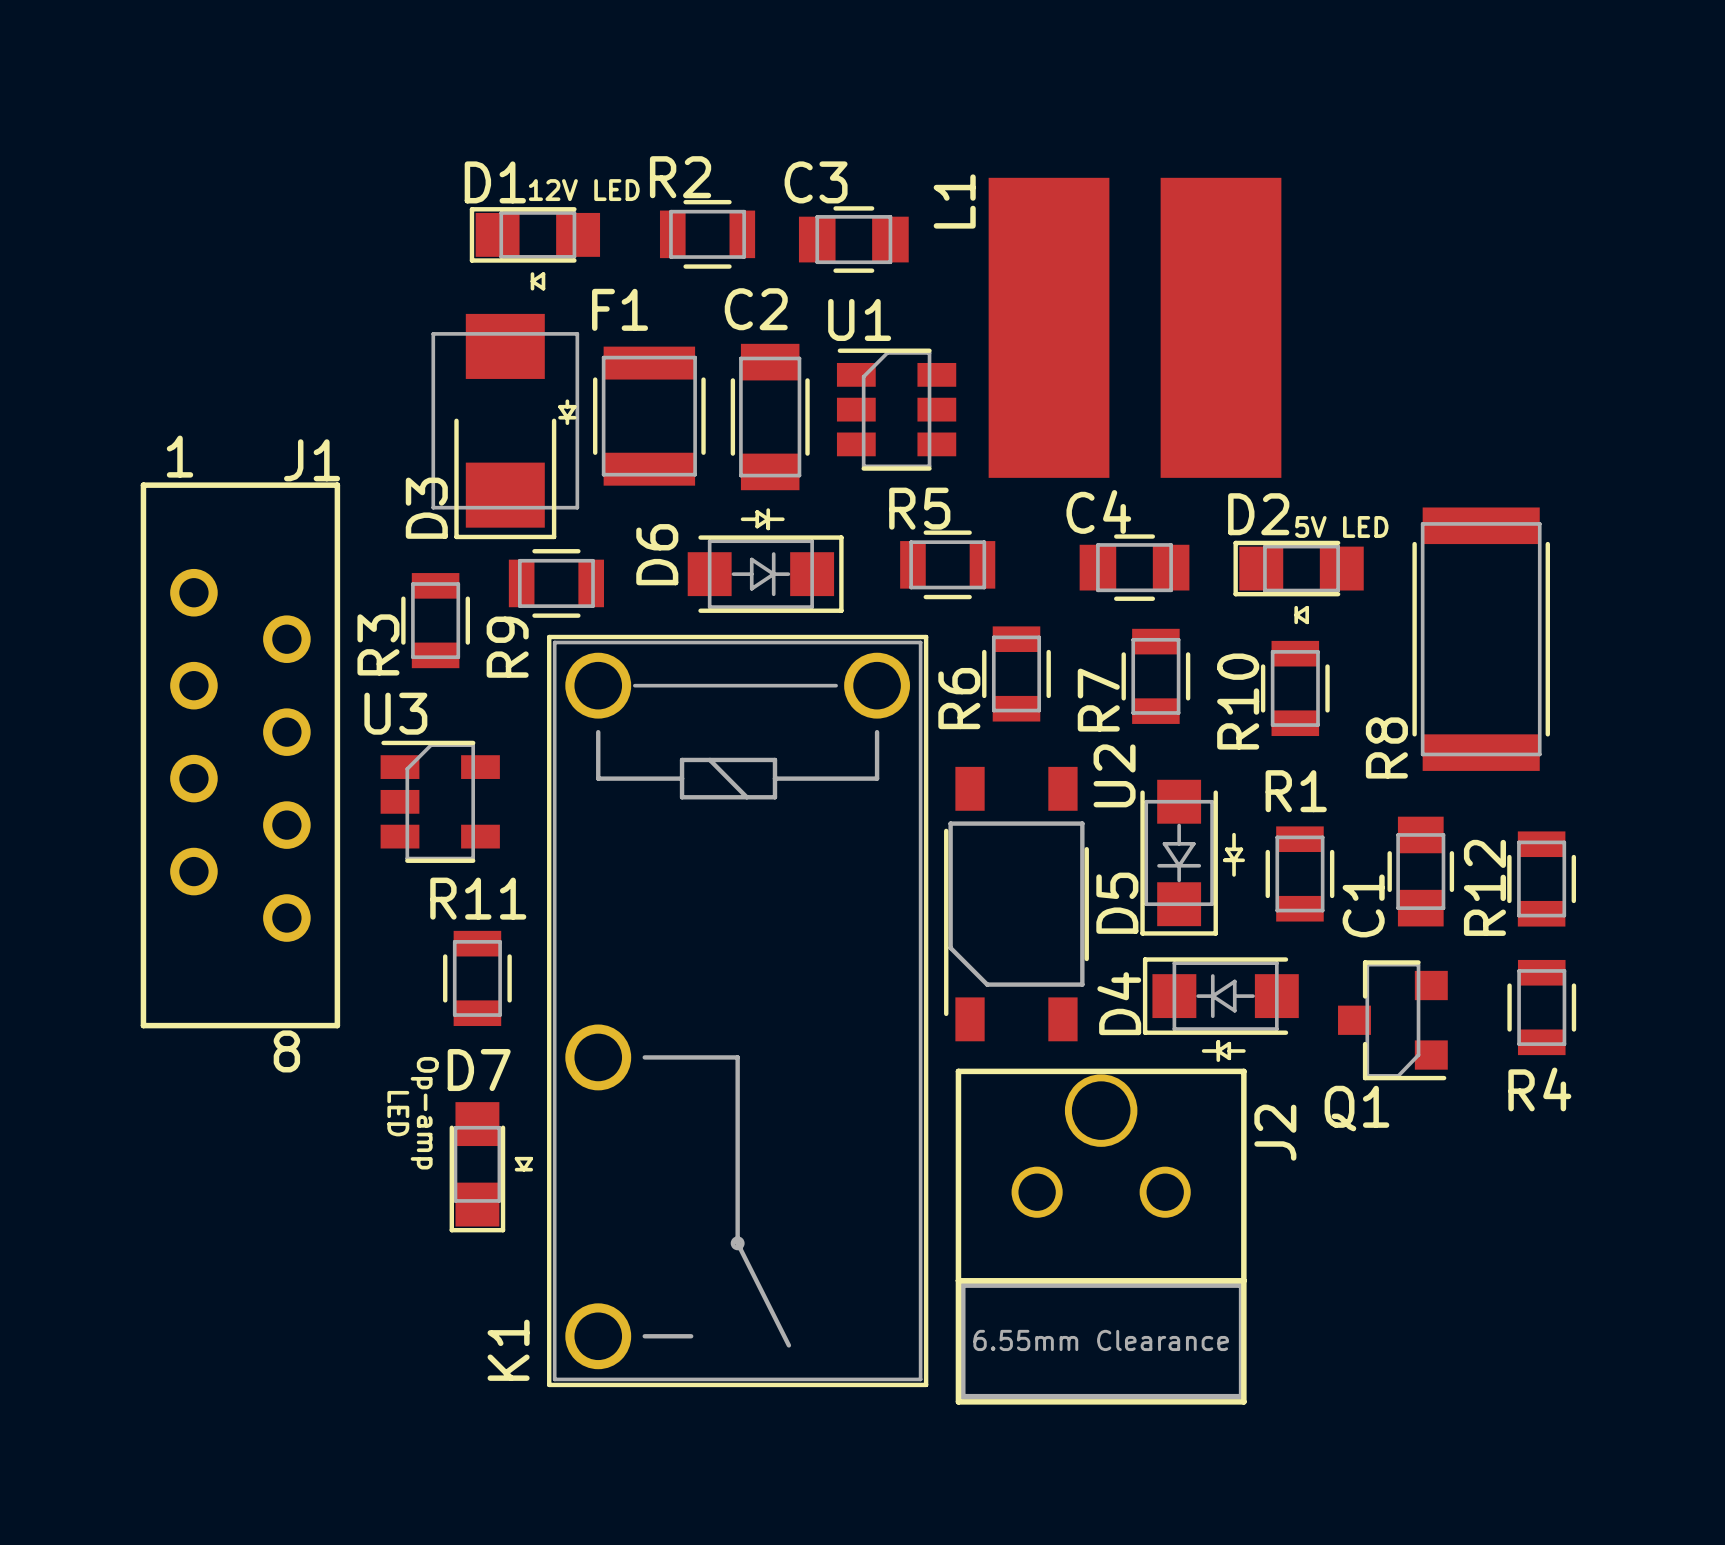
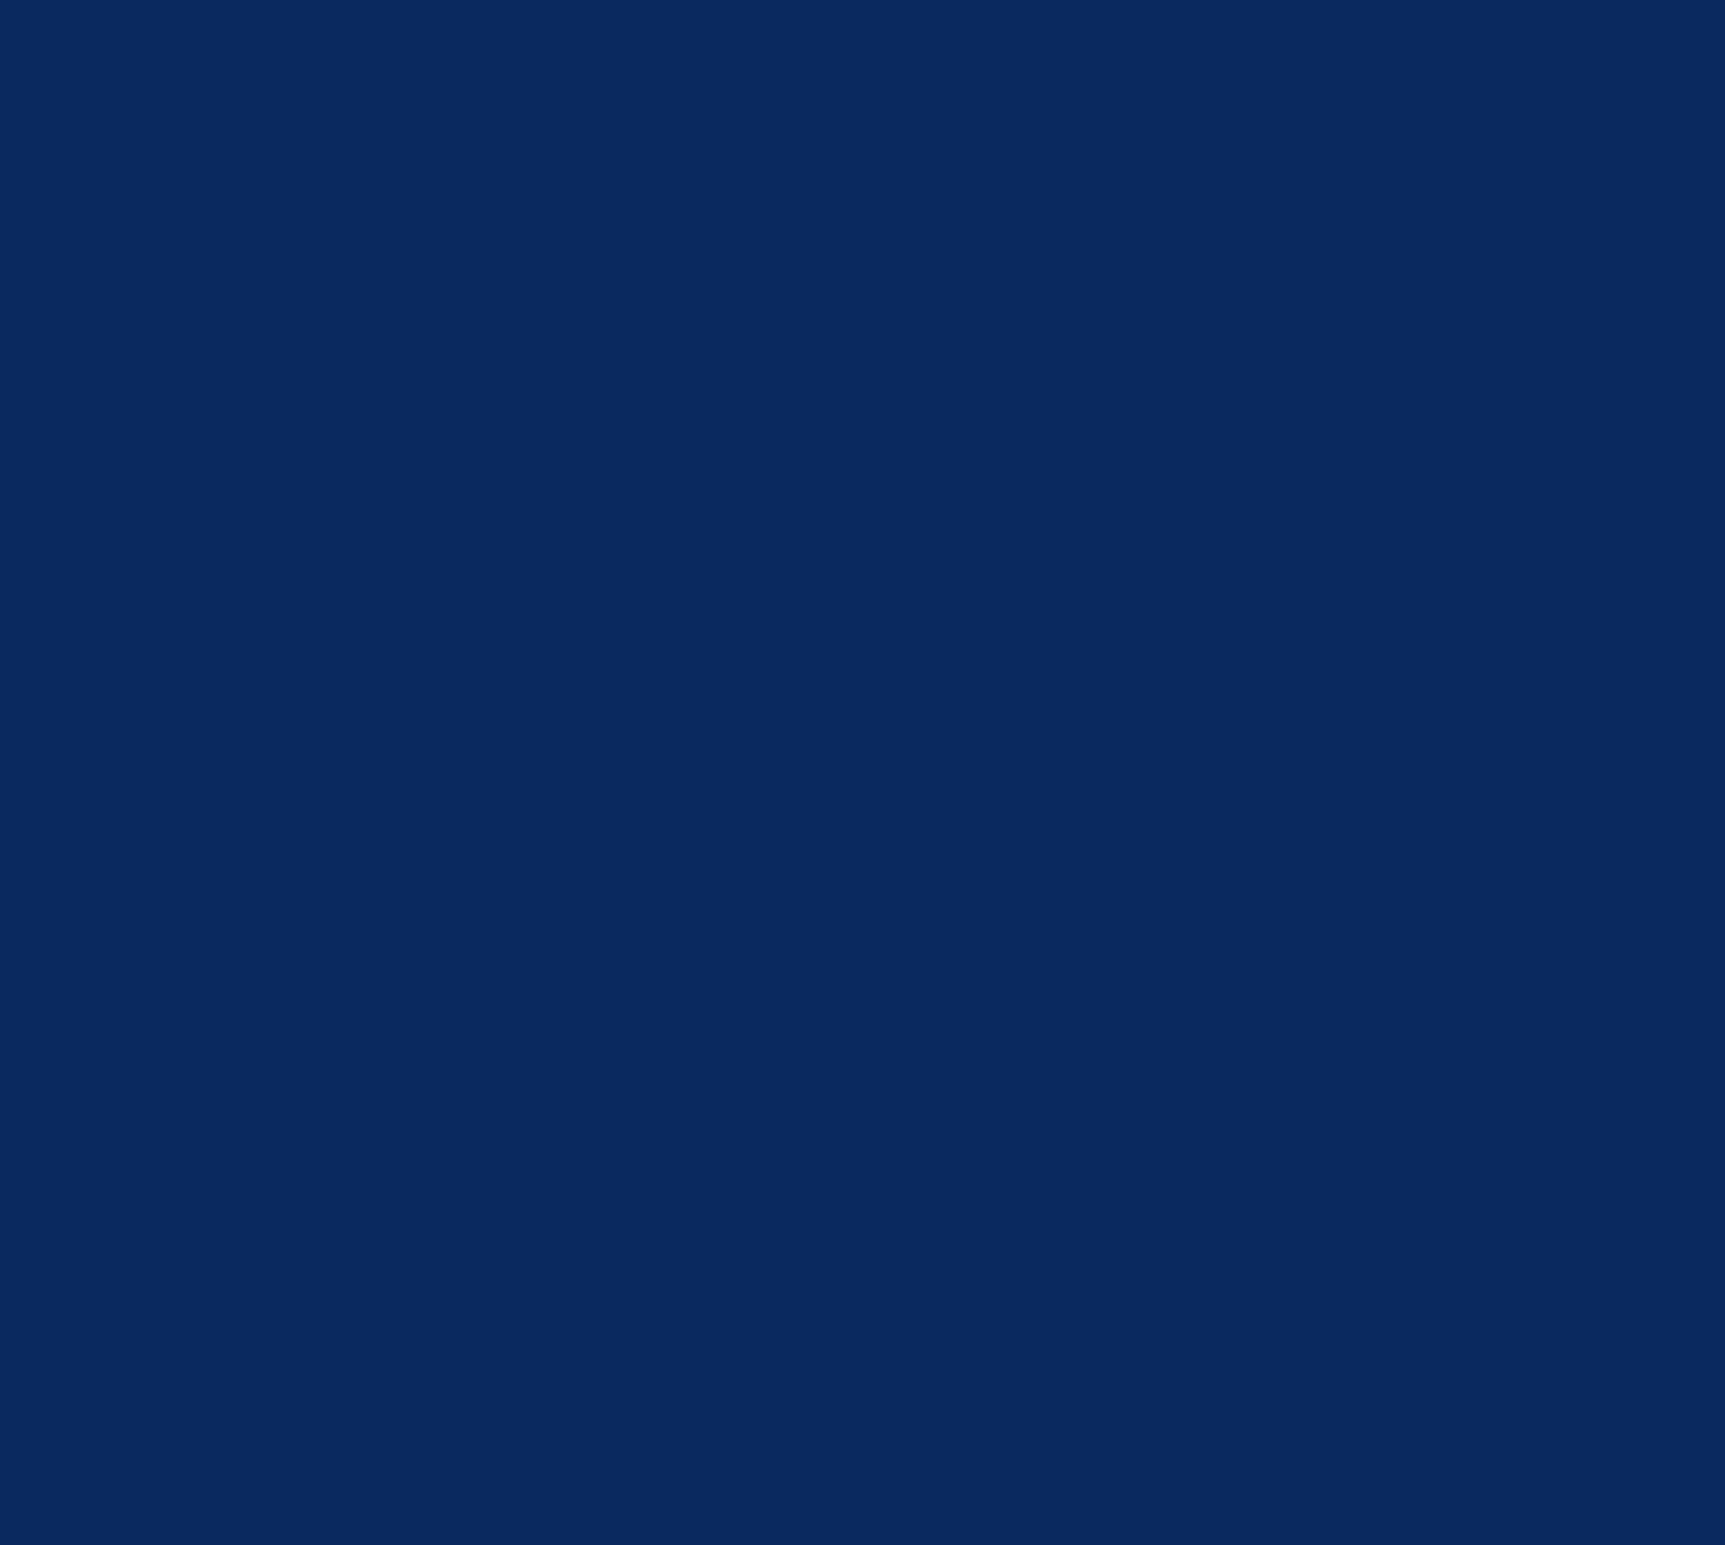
text: 12V LED (584, 190) -> none
R2: (707, 234) -> none
C3: (853, 239) -> none
D1: (534, 248) -> none
L1: (1135, 327) -> none
U1: (896, 409) -> none
F1: (649, 416) -> none
C2: (770, 417) -> none
D3: (505, 426) -> none
text: 5V LED (1341, 526) -> none
D6: (765, 560) -> none
R5: (947, 564) -> none
C4: (1134, 567) -> none
D2: (1298, 582) -> none
R9: (556, 583) -> none
R3: (435, 620) -> none
R8: (1481, 639) -> none
R6: (1016, 673) -> none
R7: (1155, 676) -> none
R10: (1295, 688) -> none
J1: (240, 755) -> none
U3: (440, 801) -> none
D5: (1192, 857) -> none
C1: (1420, 871) -> none
R1: (1299, 873) -> none
R12: (1541, 878) -> none
U2: (1016, 904) -> none
R11: (477, 978) -> none
R4: (1541, 1007) -> none
D4: (1220, 1009) -> none
K1: (737, 1010) -> none
Q1: (1392, 1020) -> none
text: LED (398, 1113) -> none
text: Op-amp (424, 1113) -> none
D7: (491, 1167) -> none
J2: (1101, 1236) -> none

